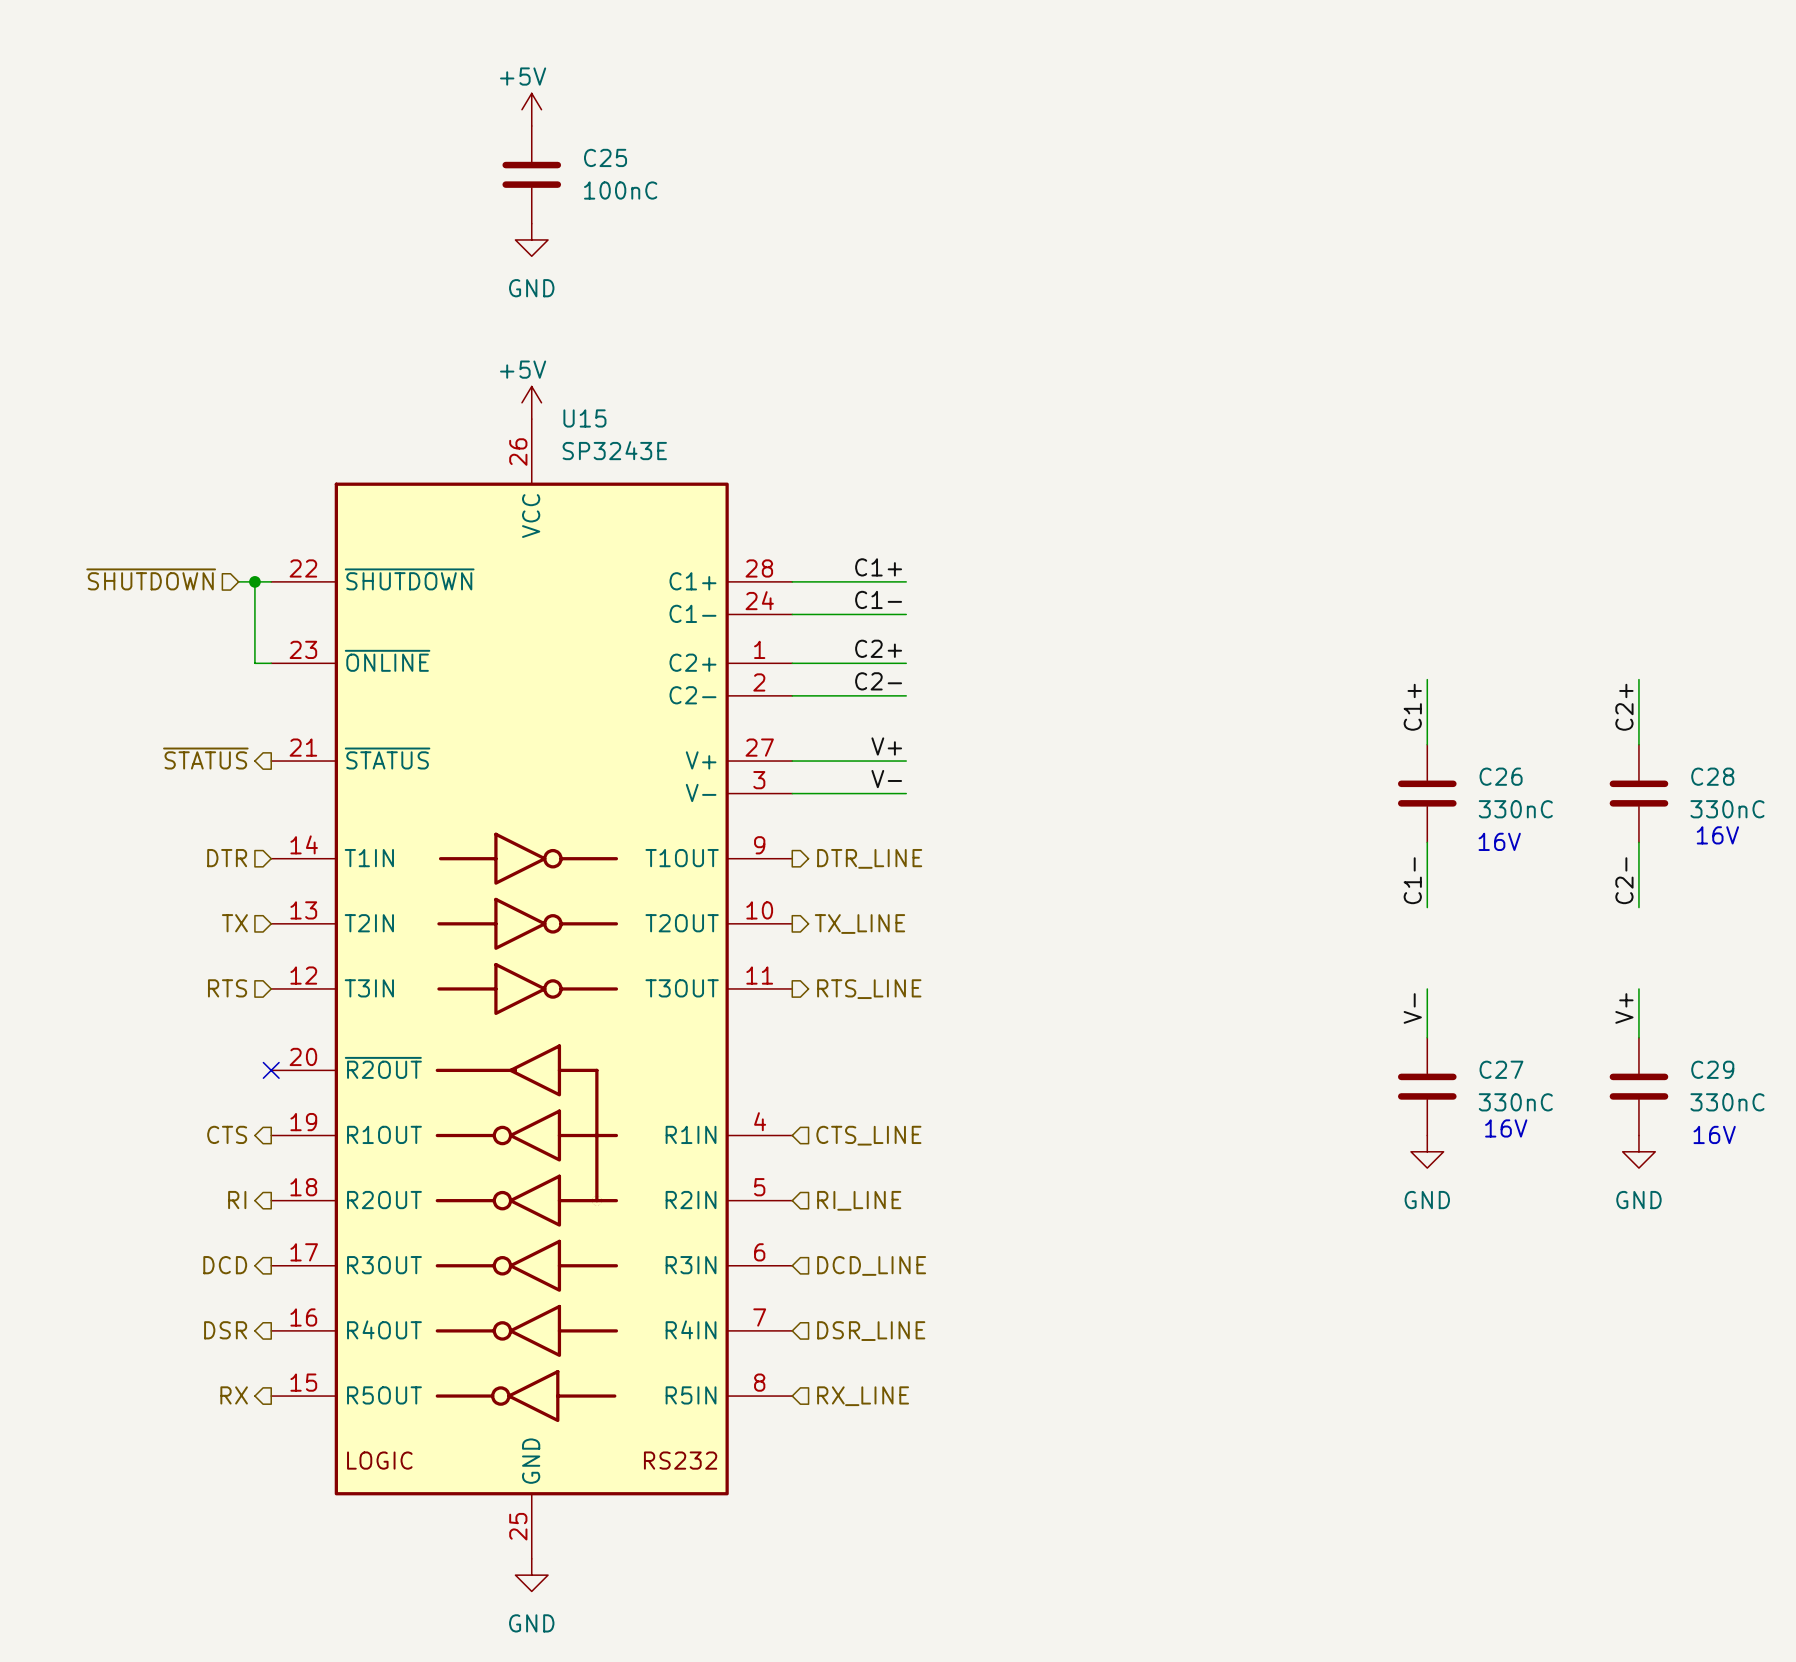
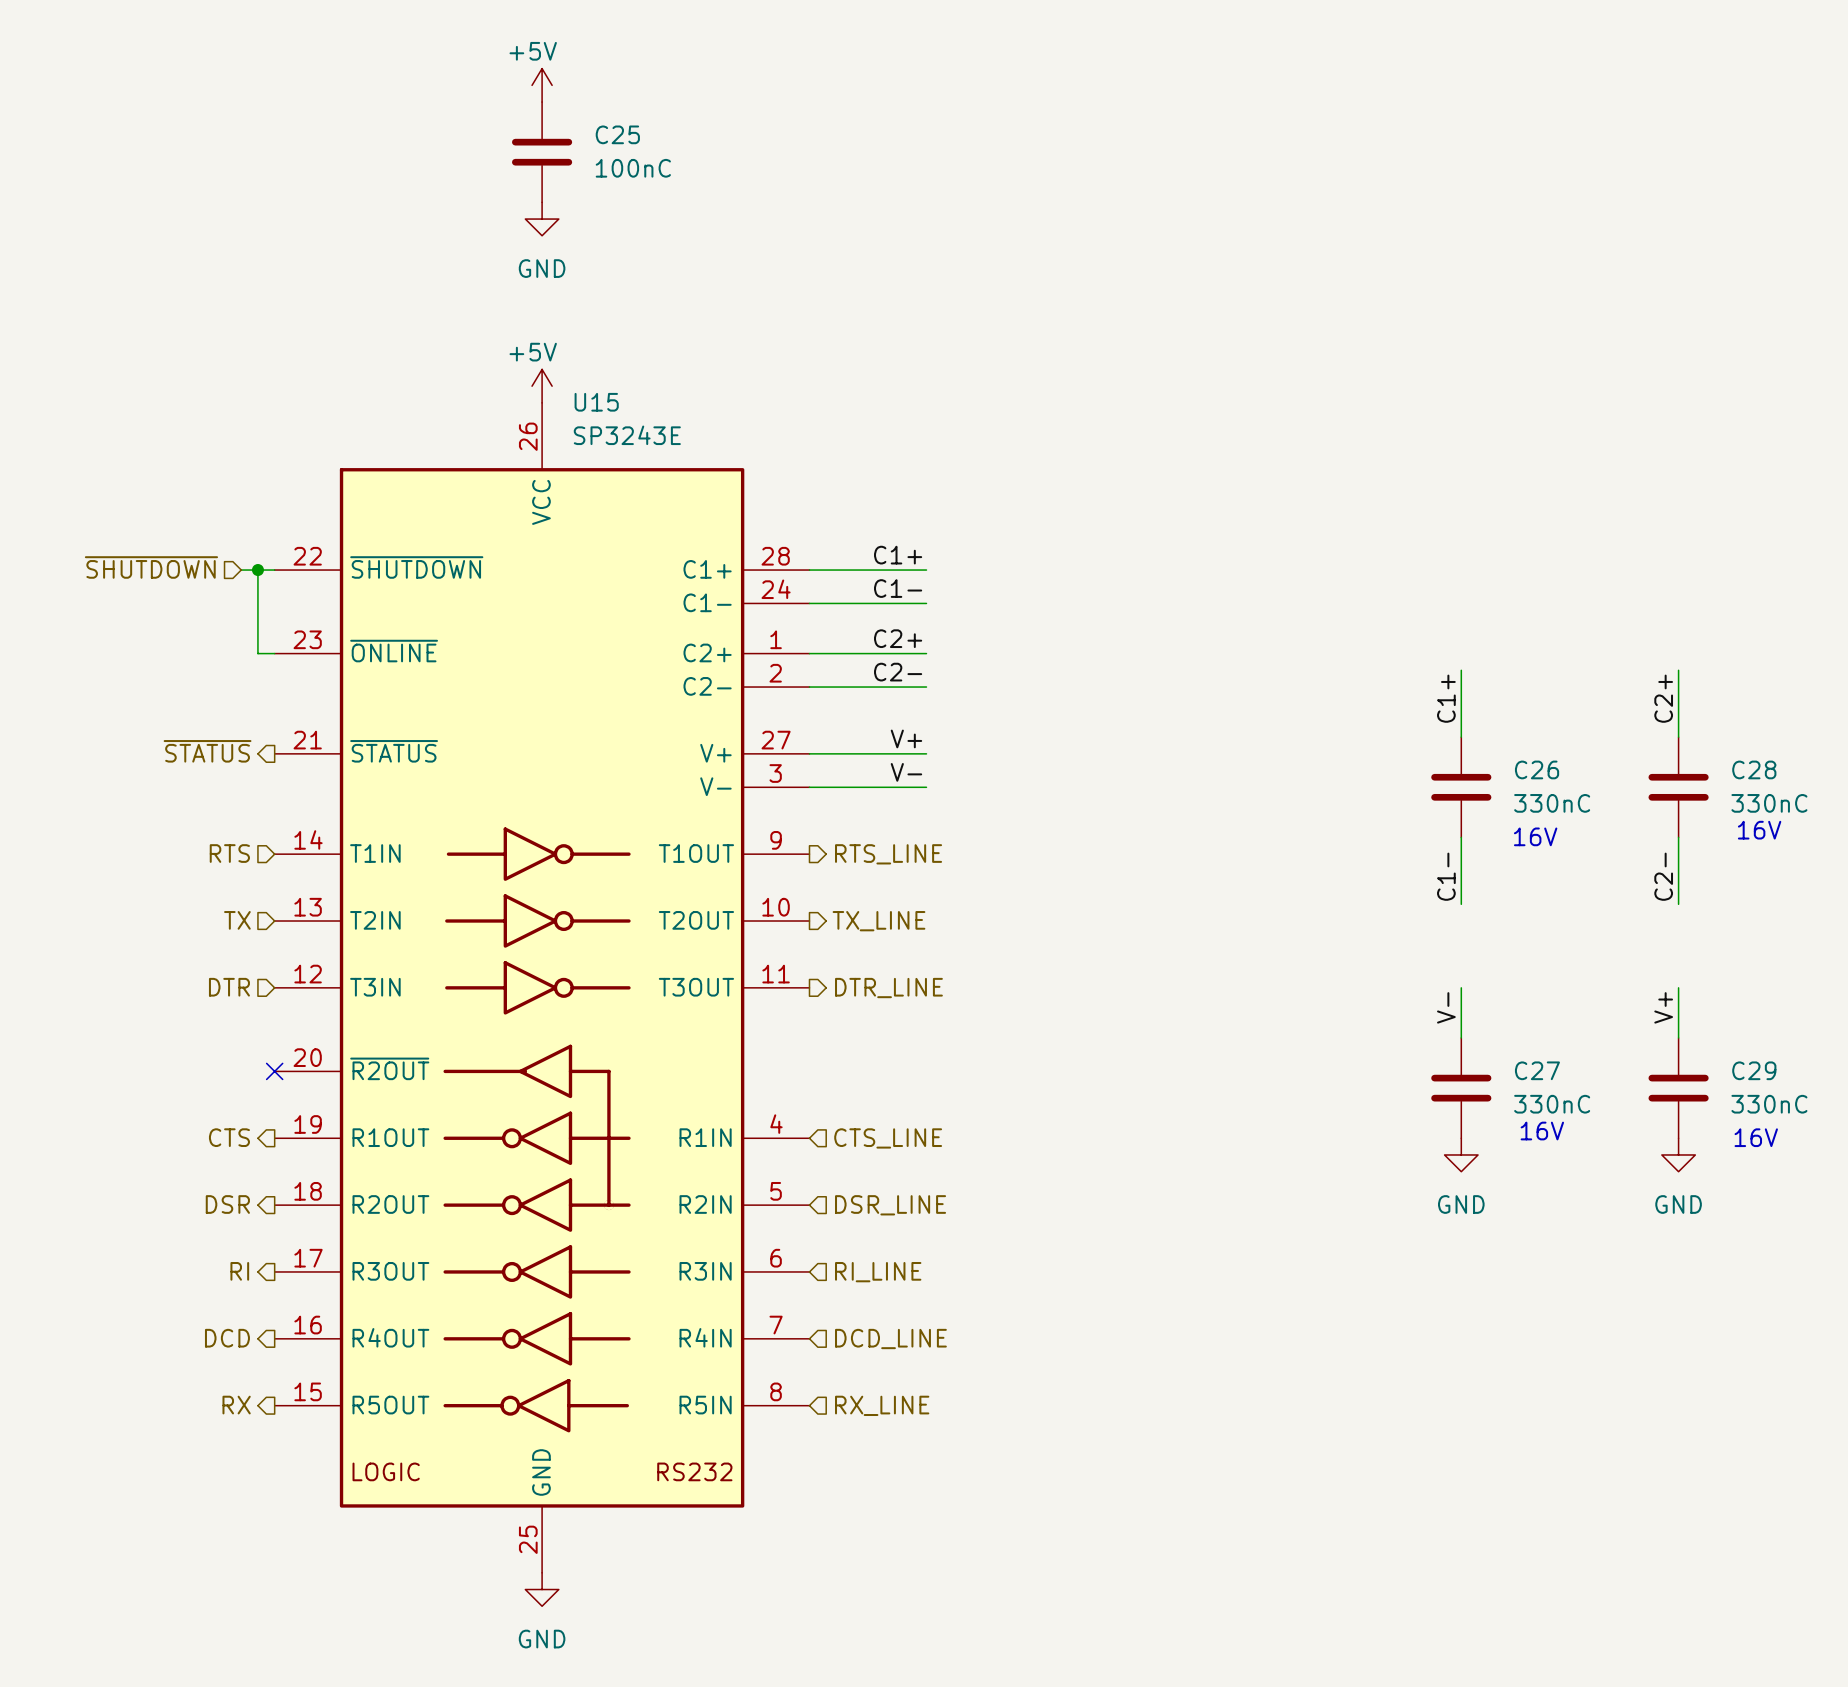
hierarchical label: DTR (227, 858) -> RTS (229, 853)
hierarchical label: DTR_LINE (869, 858) -> RTS_LINE (888, 854)
hierarchical label: RTS (227, 988) -> DTR (229, 987)
hierarchical label: RTS_LINE (869, 989) -> DTR_LINE (888, 988)
hierarchical label: RI (237, 1200) -> DSR (227, 1204)
hierarchical label: RI_LINE (859, 1200) -> DSR_LINE (890, 1205)
hierarchical label: DCD (225, 1265) -> RI (239, 1271)
hierarchical label: DCD_LINE (871, 1265) -> RI_LINE (878, 1272)
hierarchical label: DSR (225, 1330) -> DCD (227, 1338)
hierarchical label: DSR_LINE (871, 1331) -> DCD_LINE (890, 1339)

